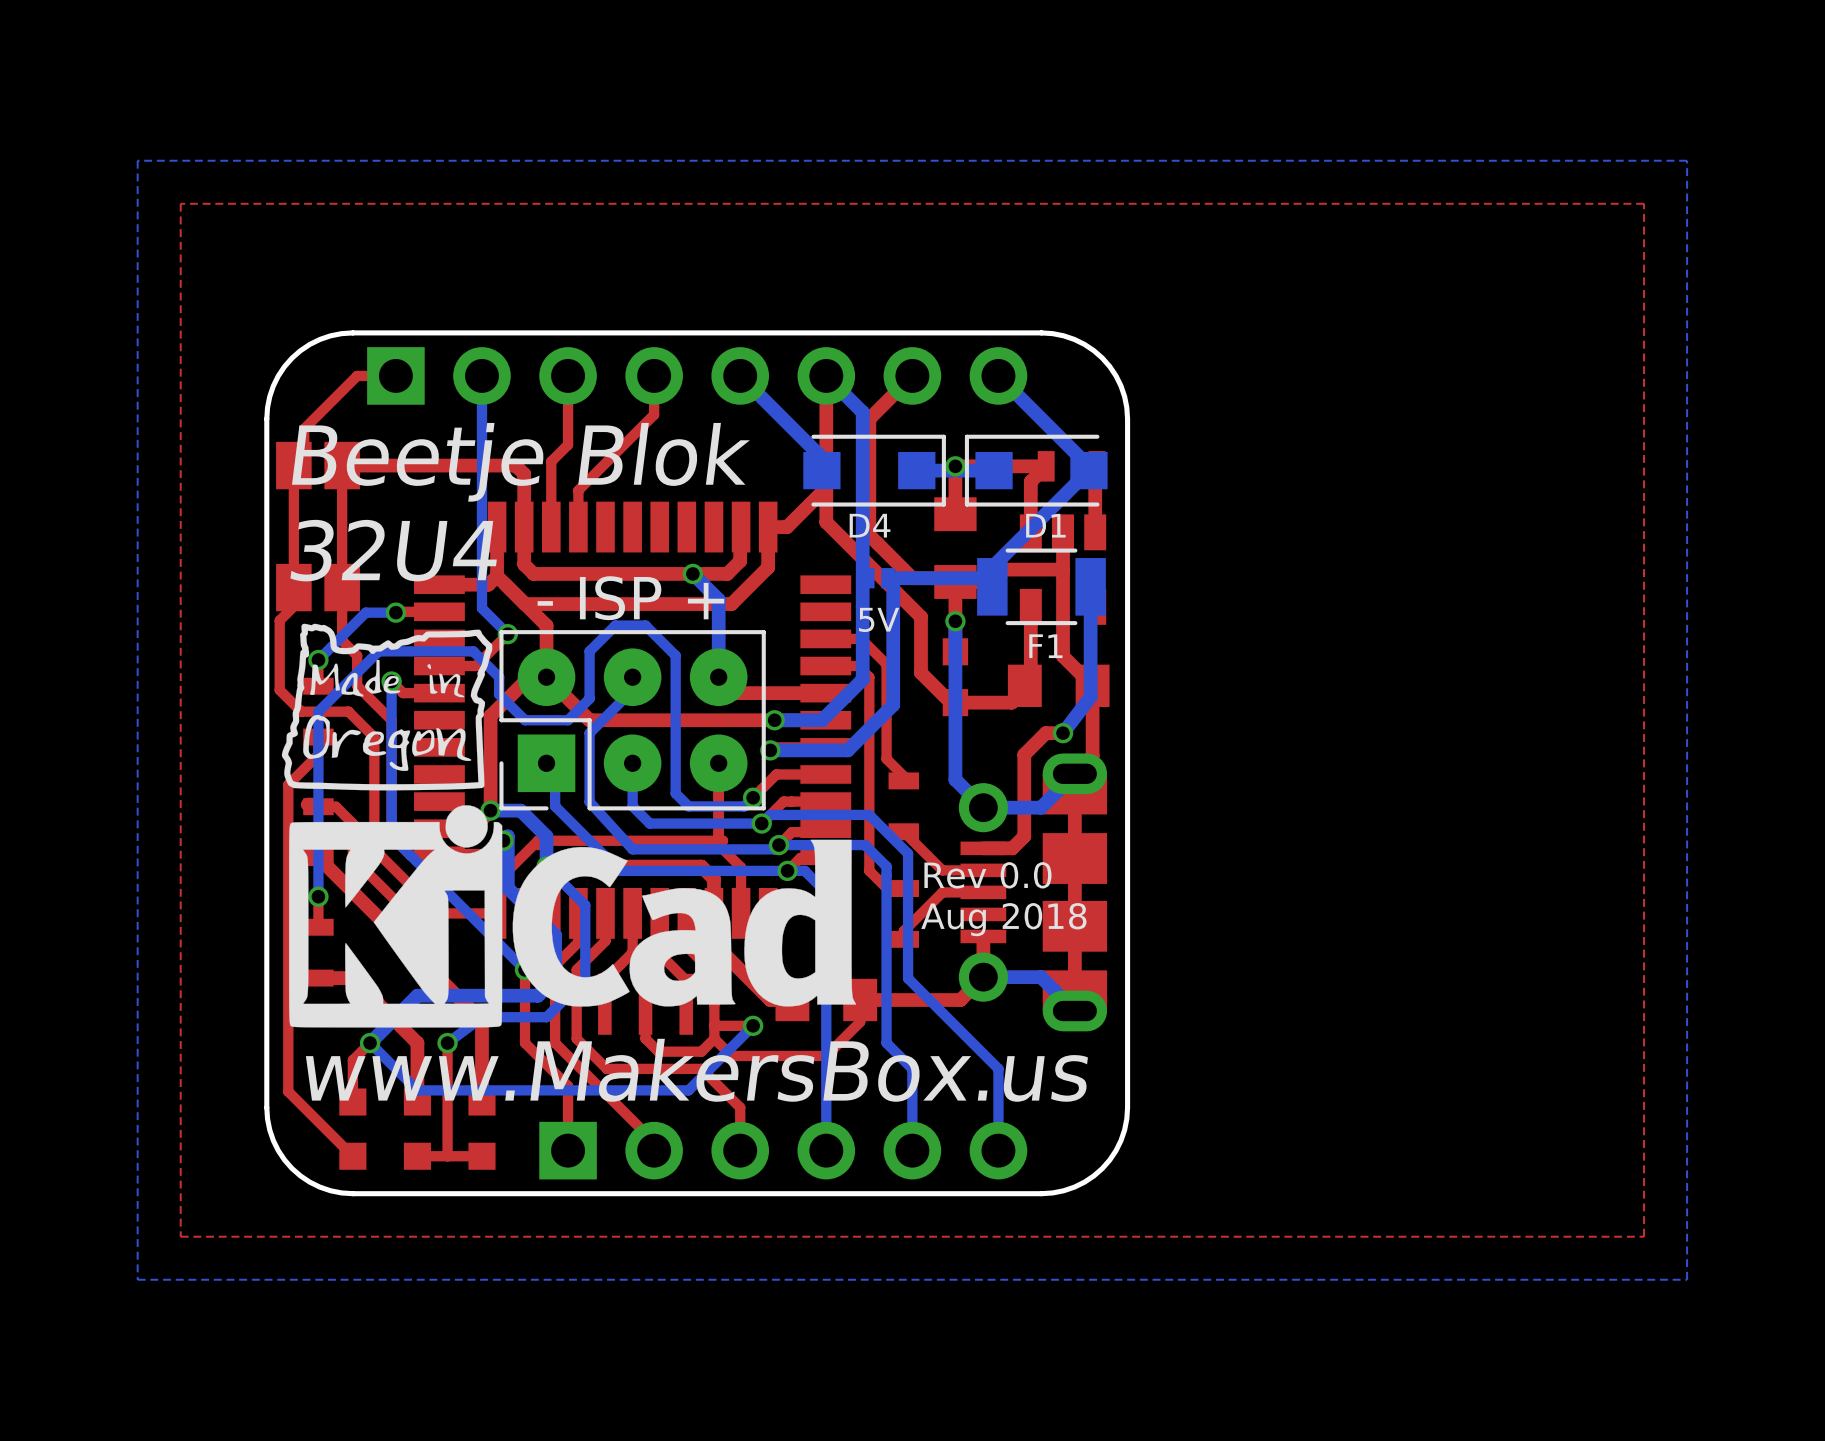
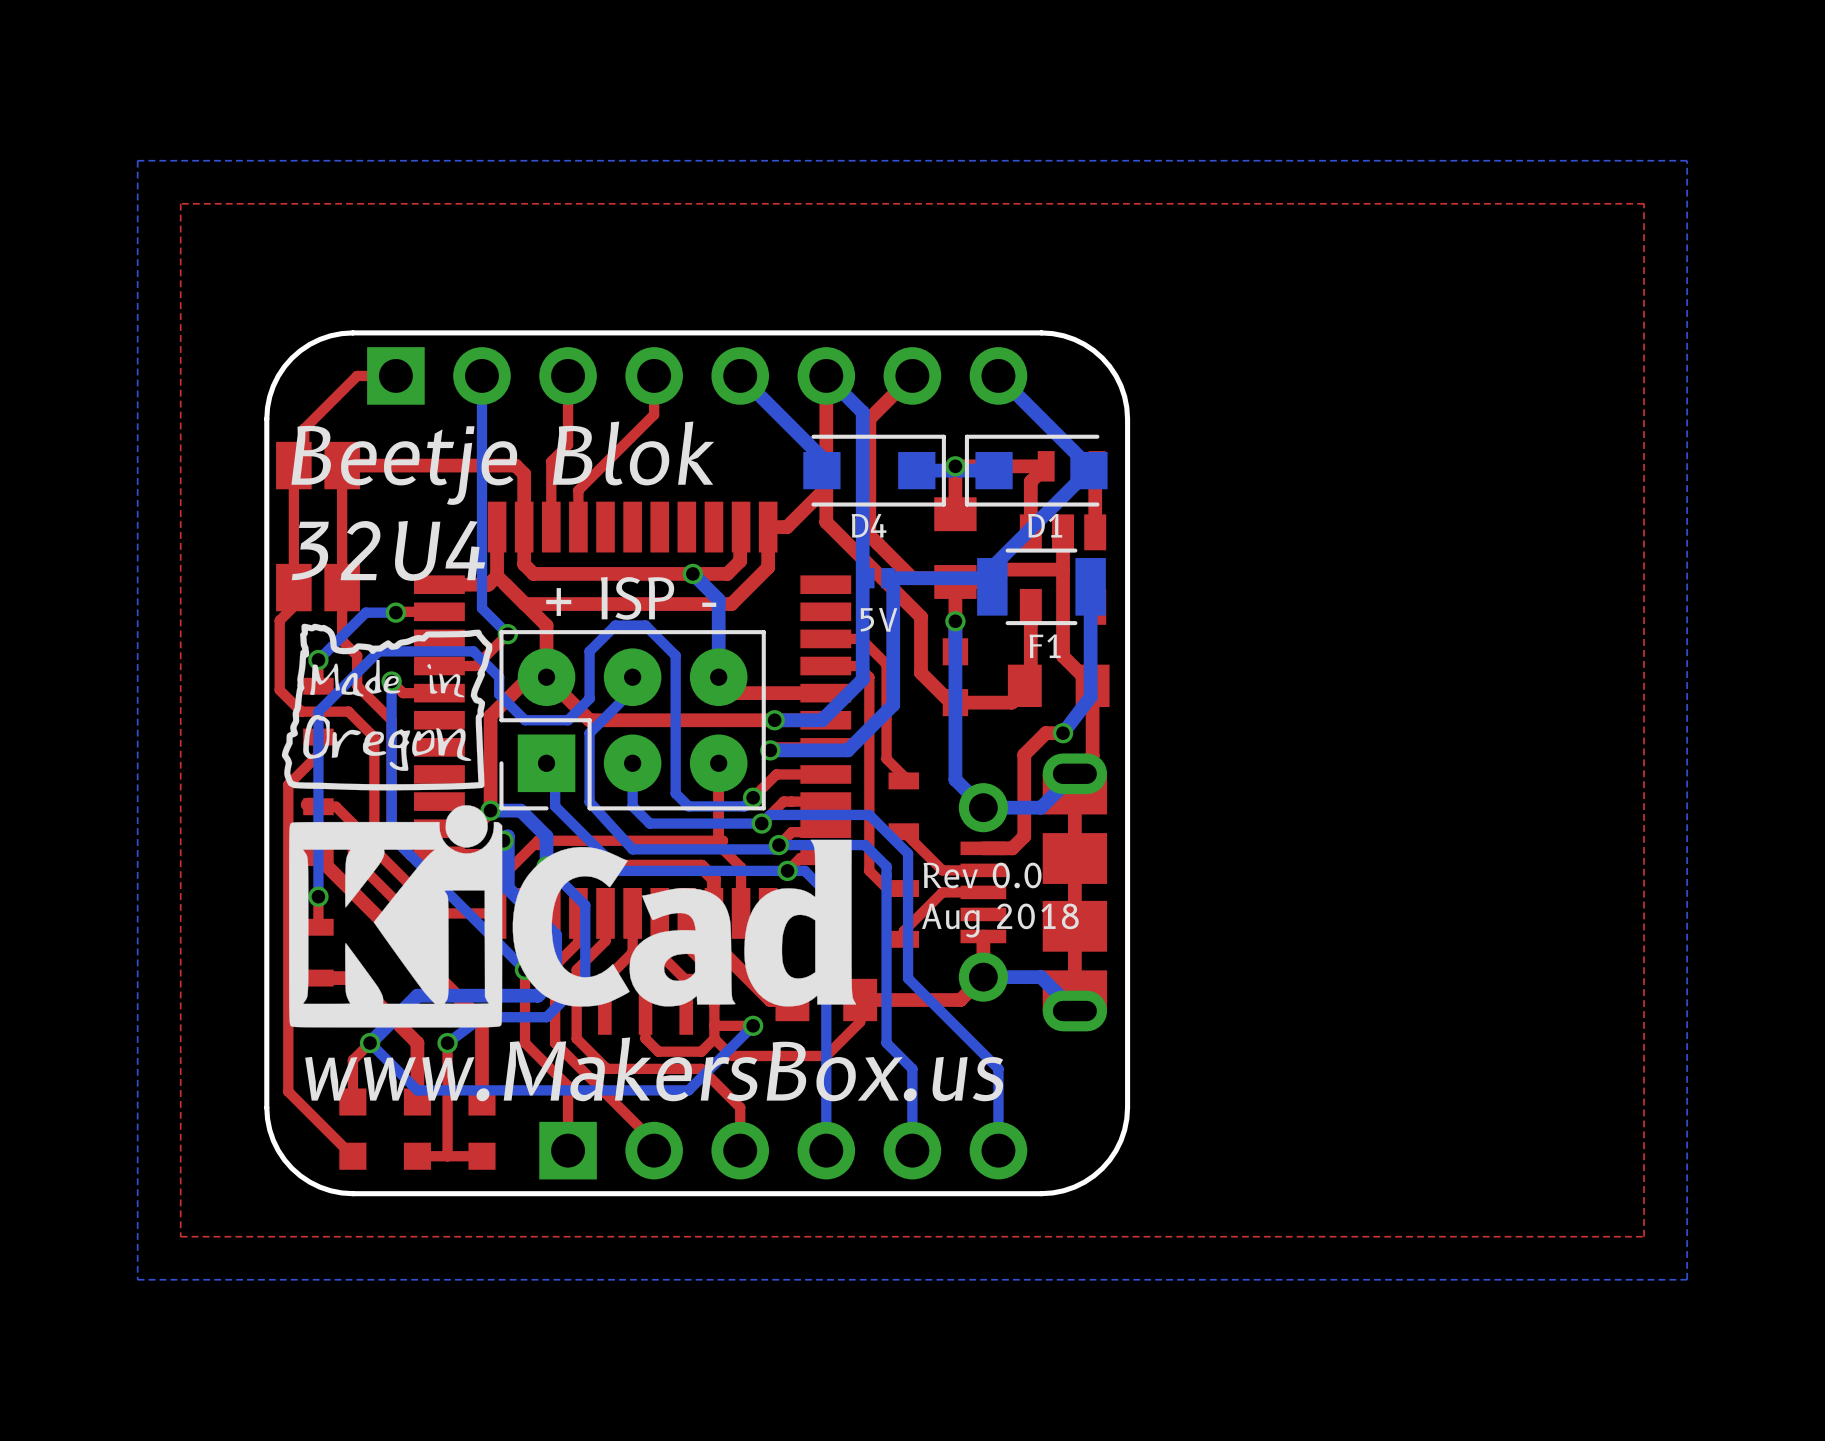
text: - ISP + (630, 598) -> + ISP - (631, 598)

